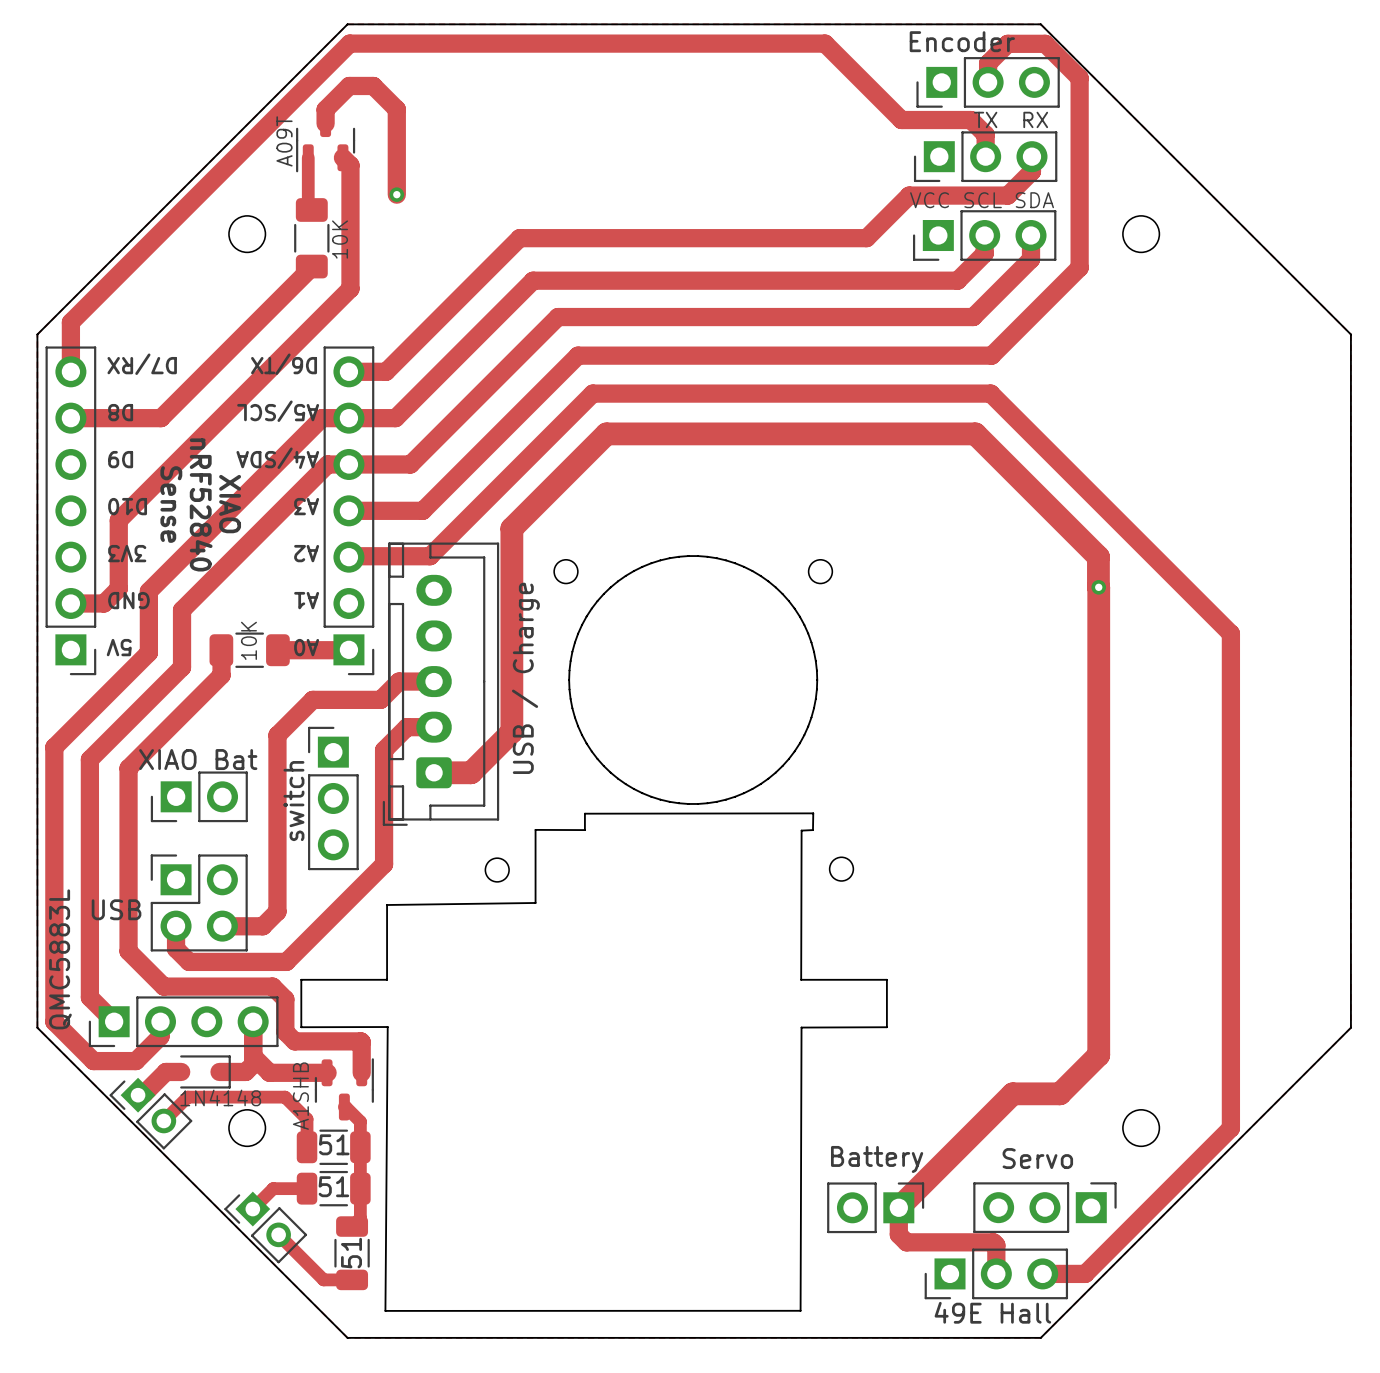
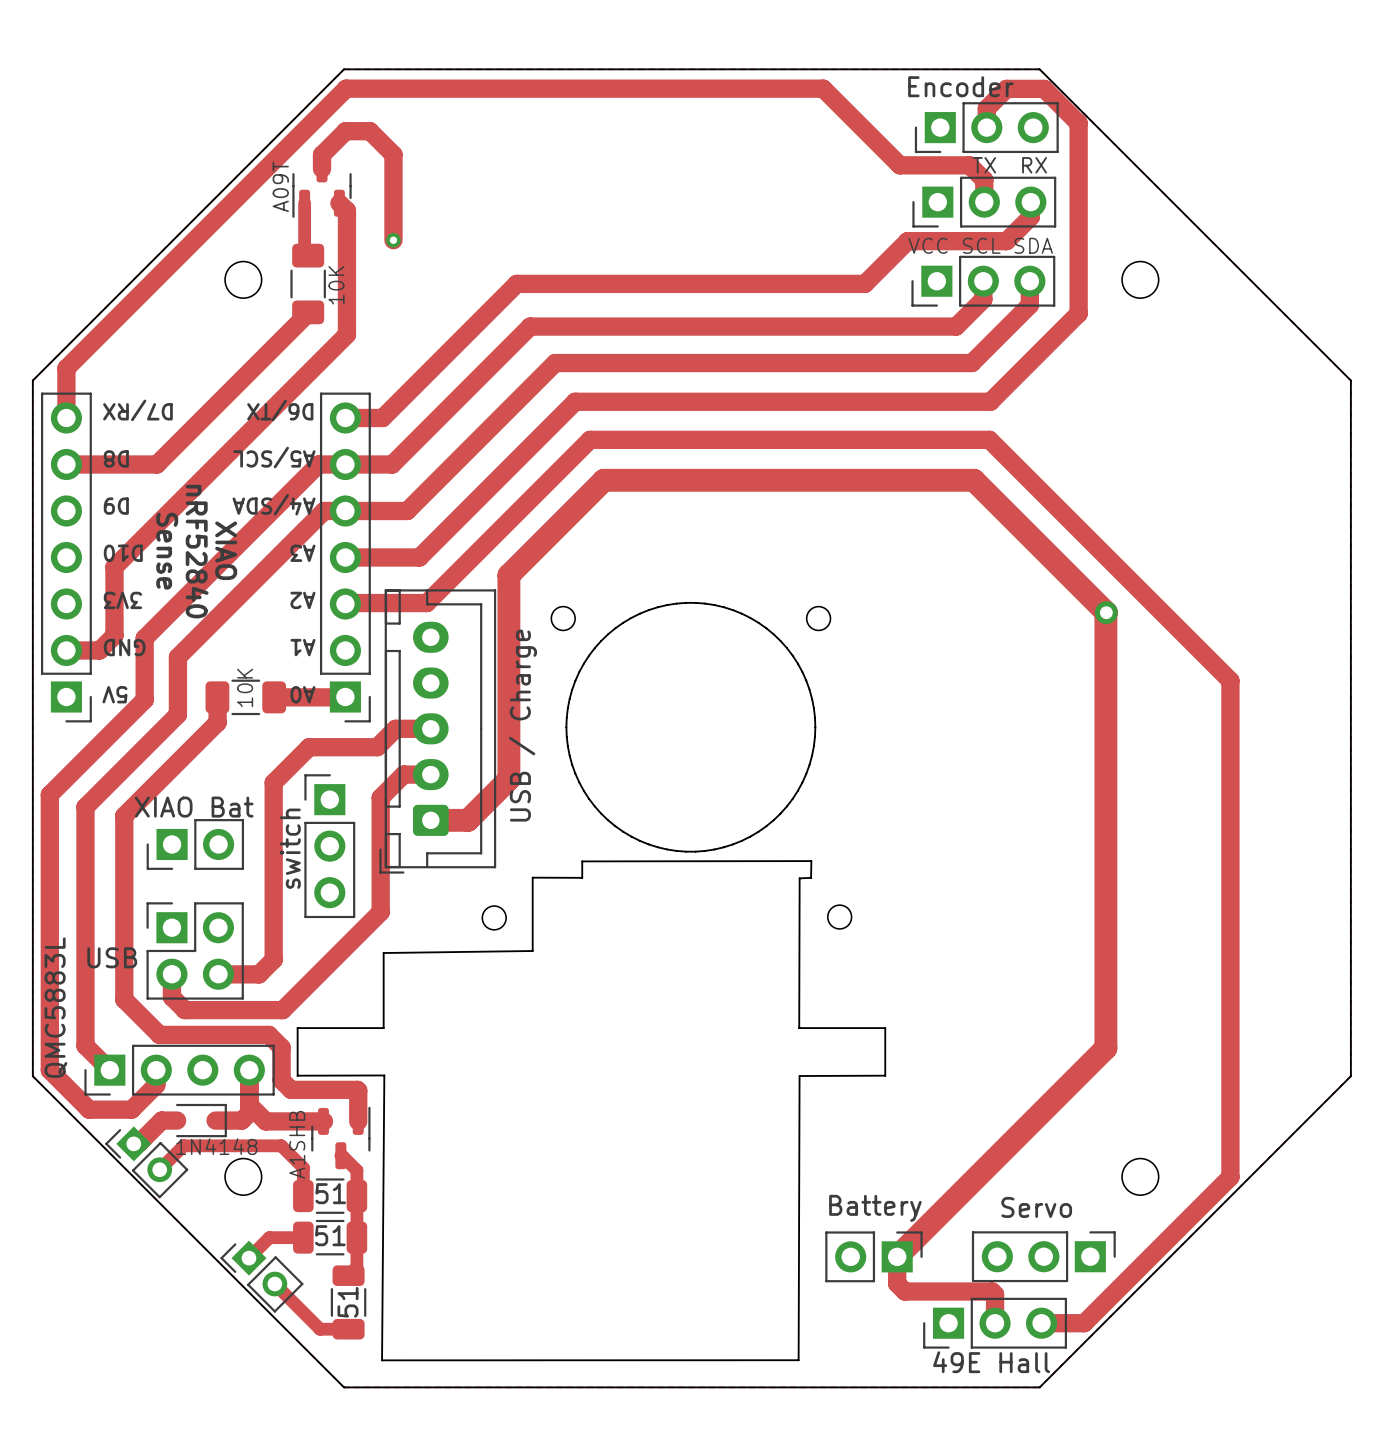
track: (1098, 556) (1098, 1055) (1060, 1093) (1012, 1093) -> (1097, 603) (1106, 612) (1105, 1048) (1011, 1142)
via: none -> (1106, 612)
via: (1098, 587) -> none

